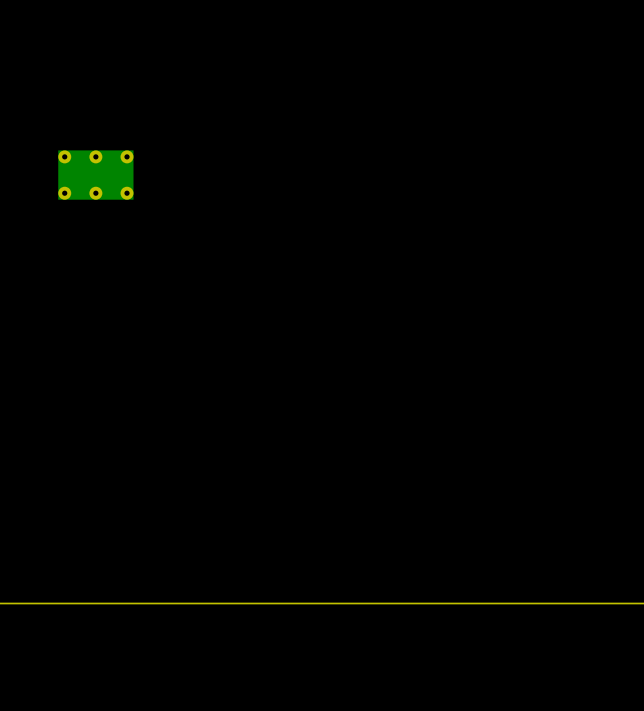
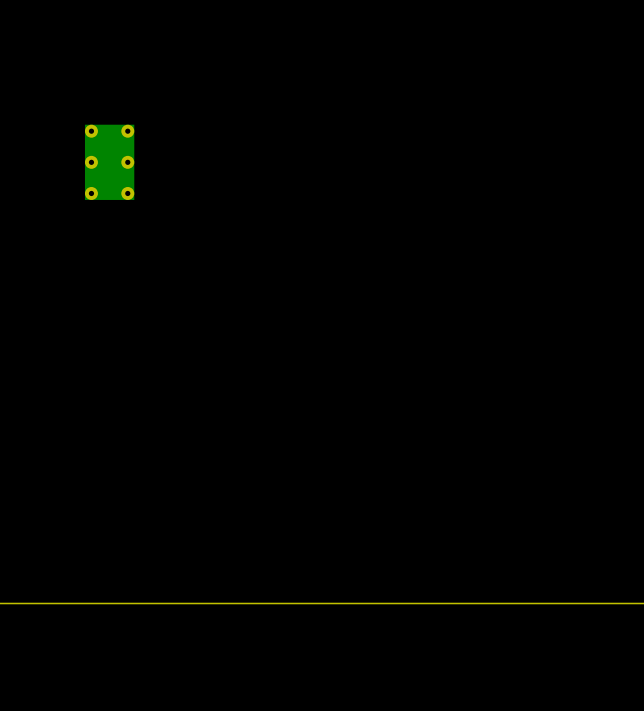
part rotation: 0° (95, 175) -> 90° clockwise (109, 162)

